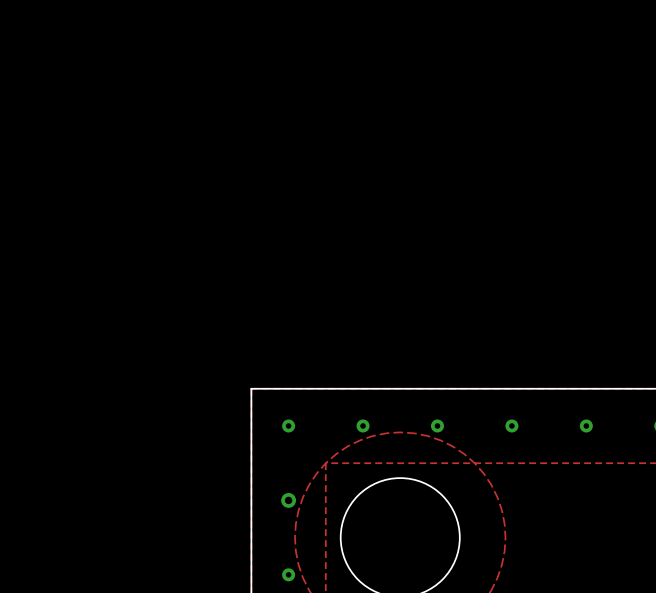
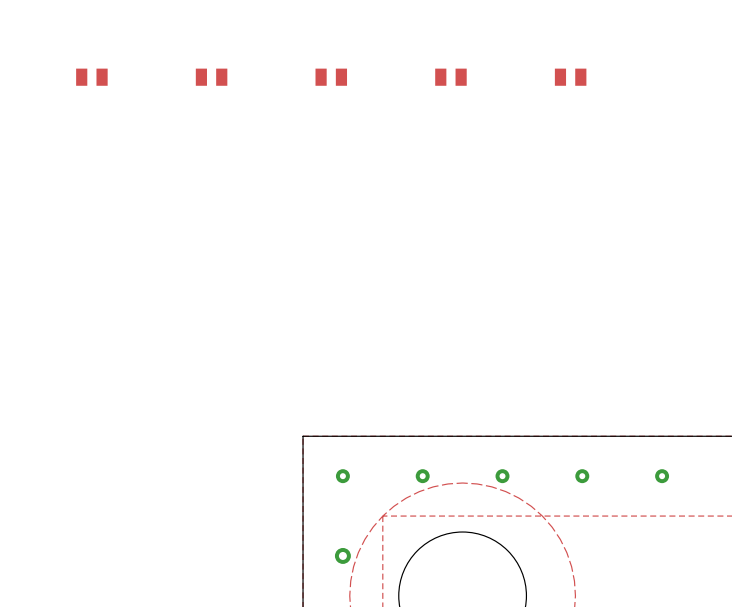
part: none -> (91, 77)
part: none -> (211, 77)
part: none -> (331, 77)
part: none -> (450, 77)
part: none -> (570, 77)

